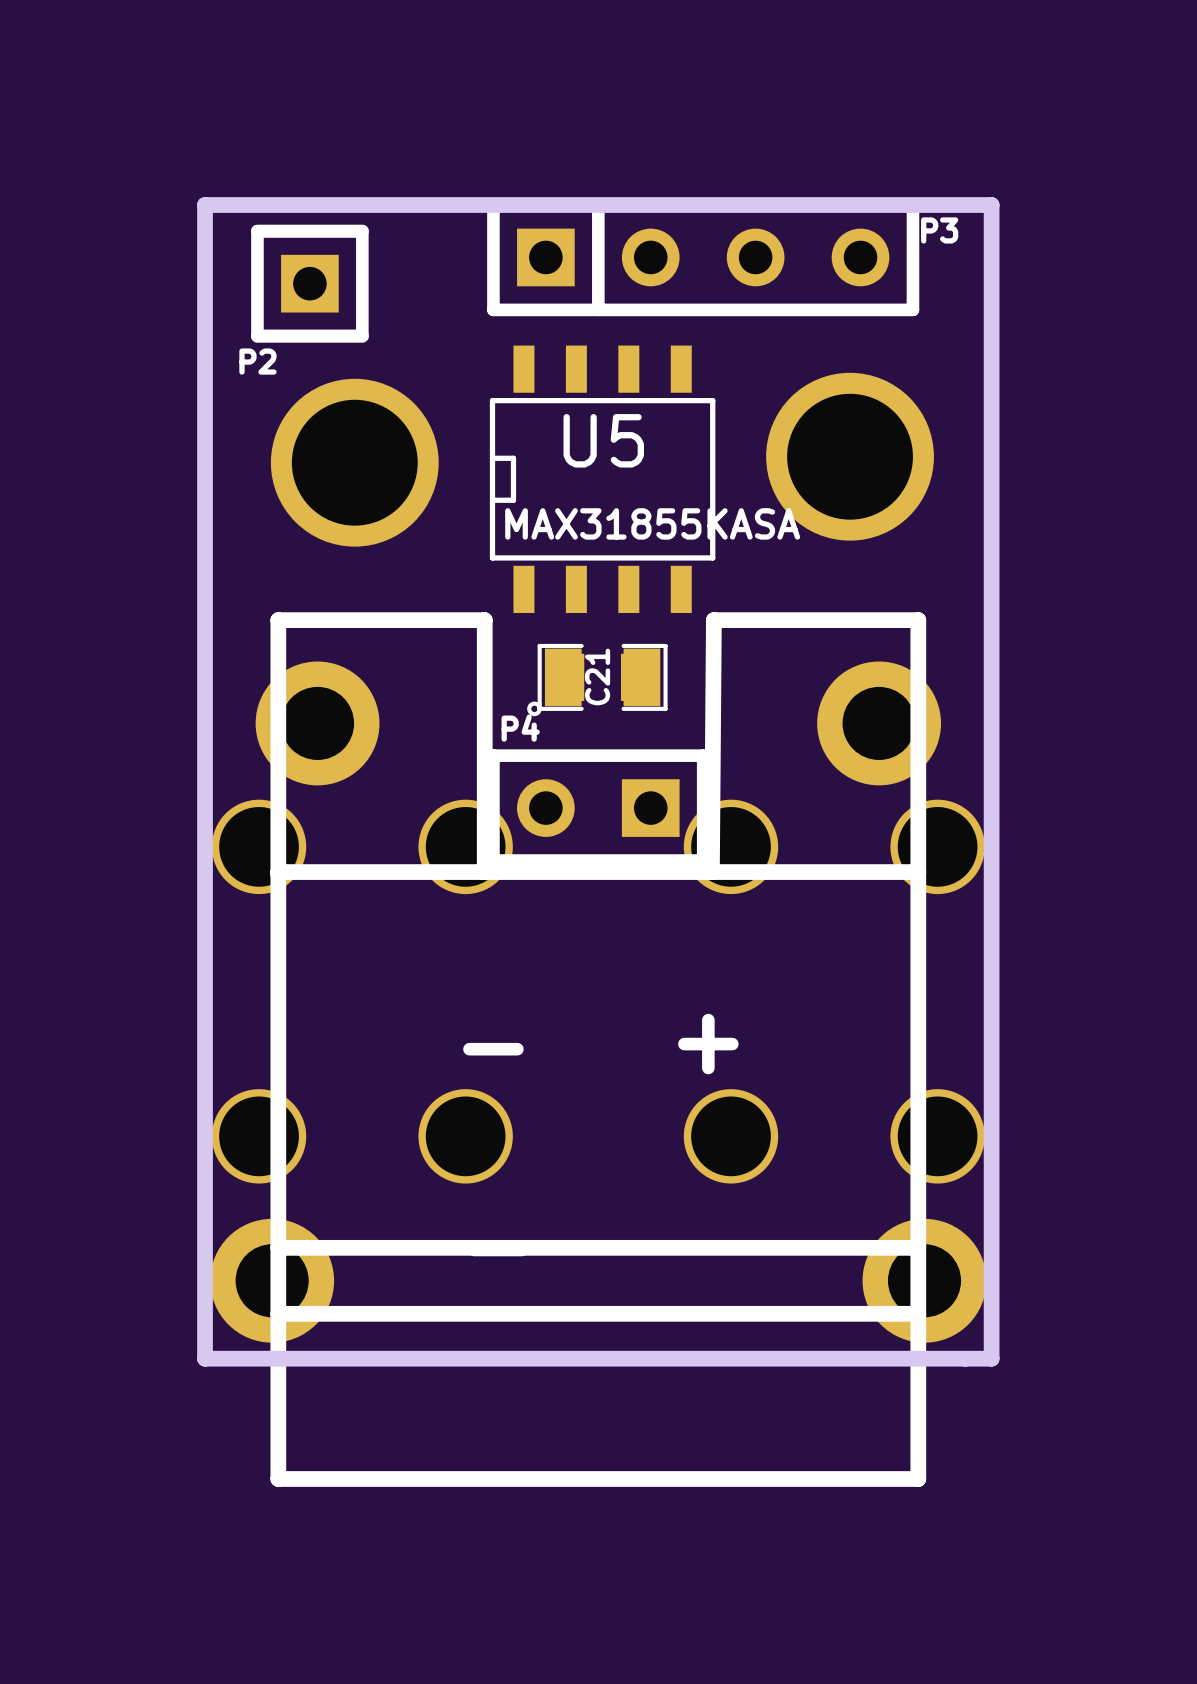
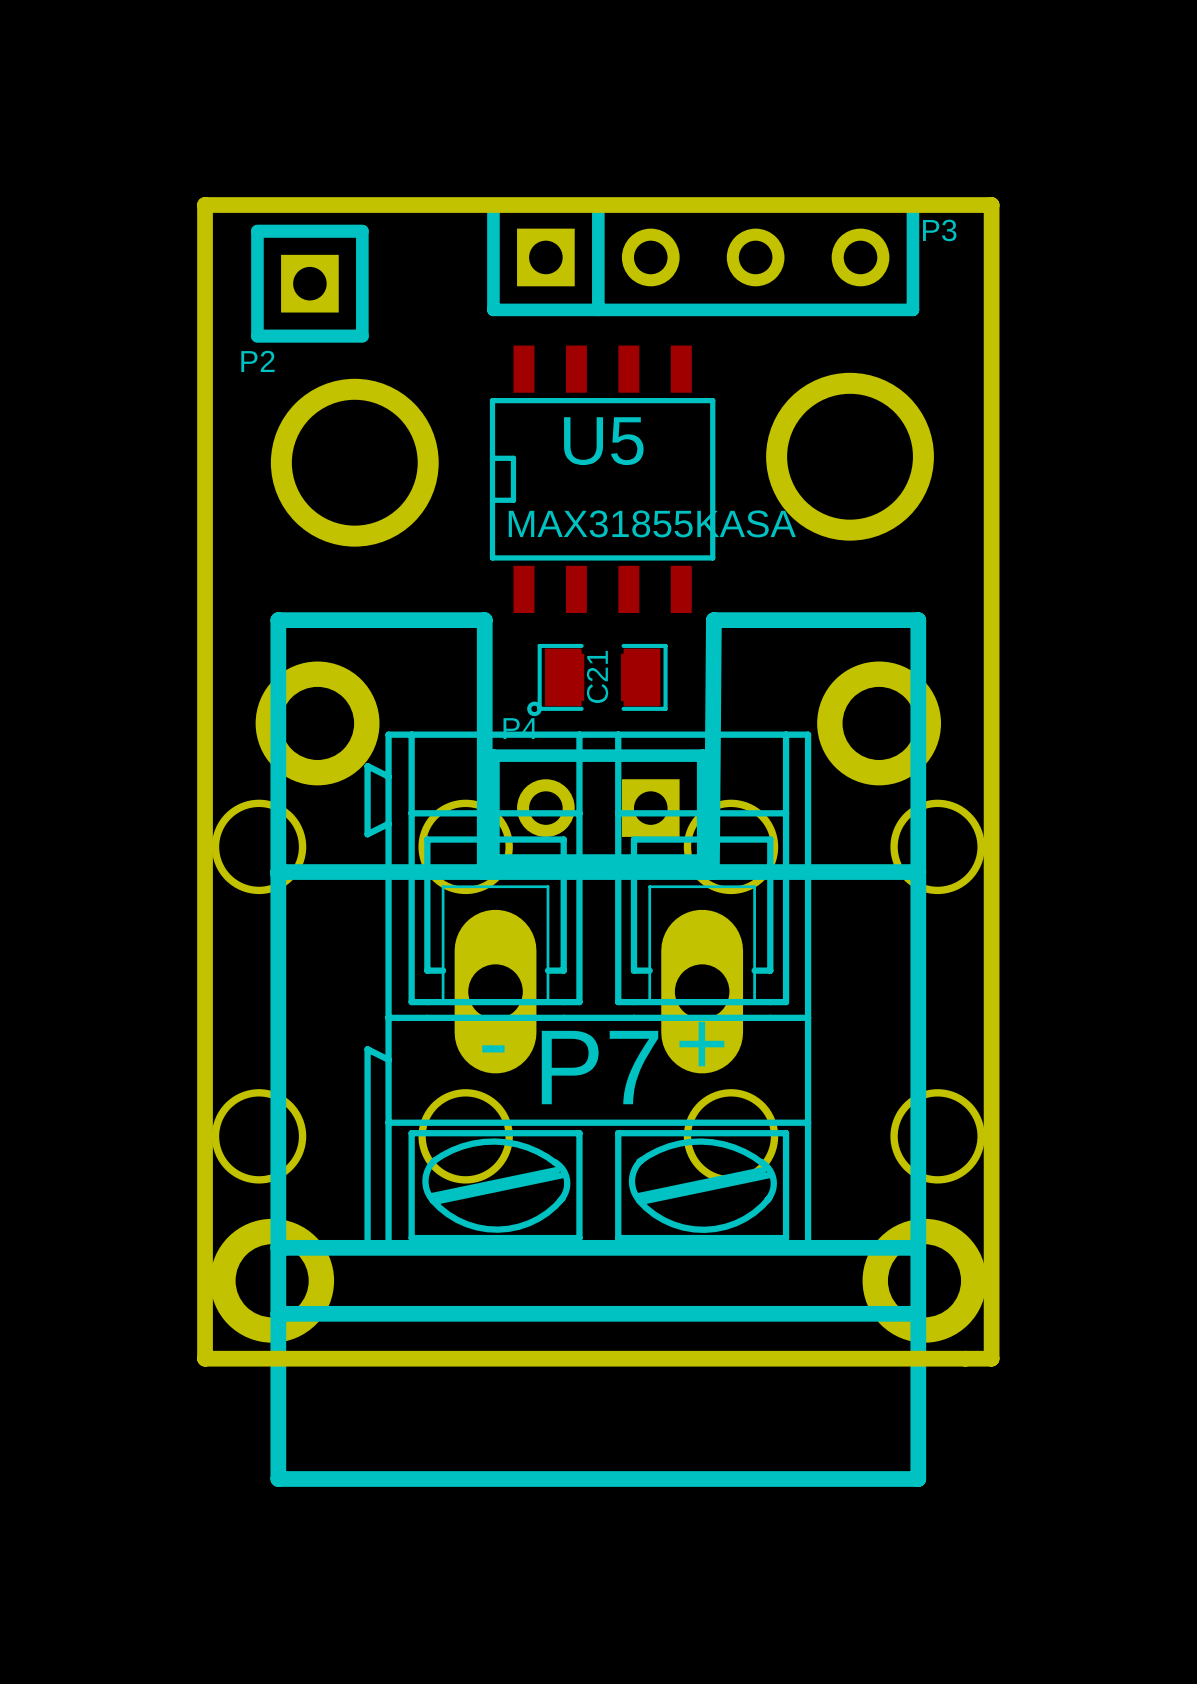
P7: none -> (587, 991)

